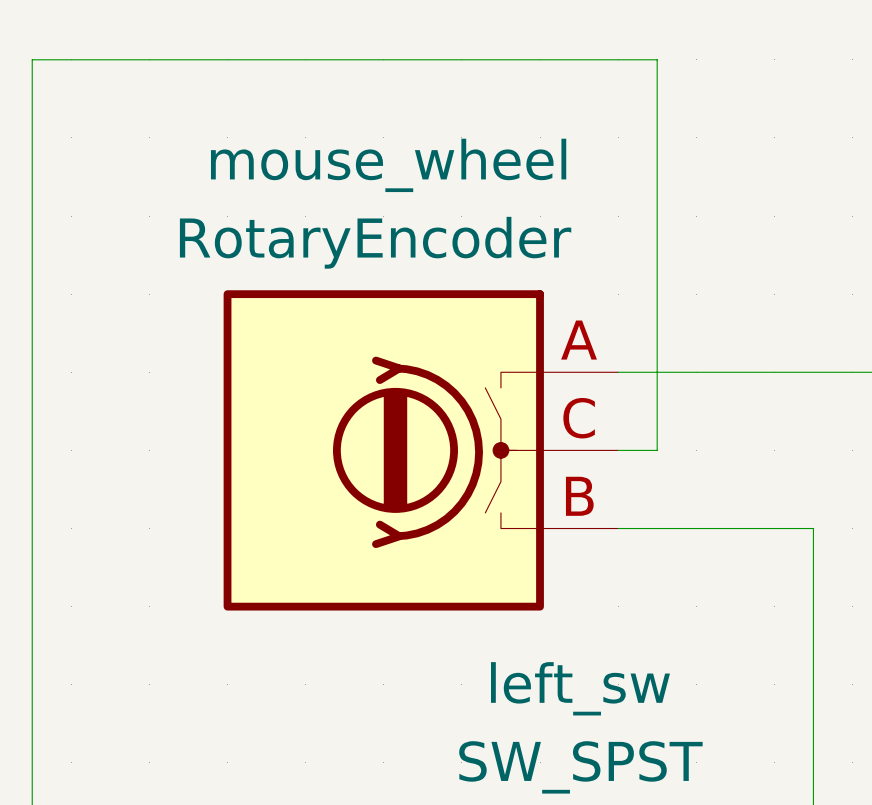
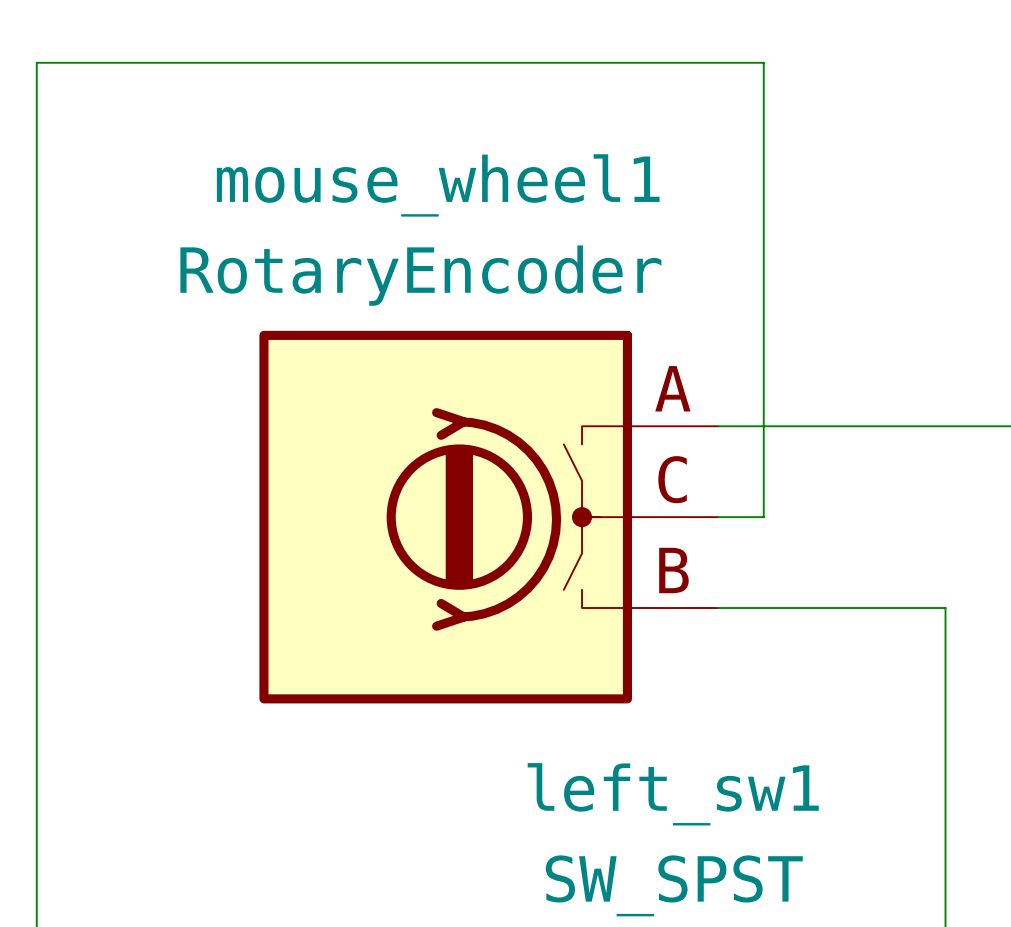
mouse_wheel name: mouse_wheel (388, 165) -> mouse_wheel1 (438, 185)
left_sw name: left_sw (580, 688) -> left_sw1 (673, 794)

